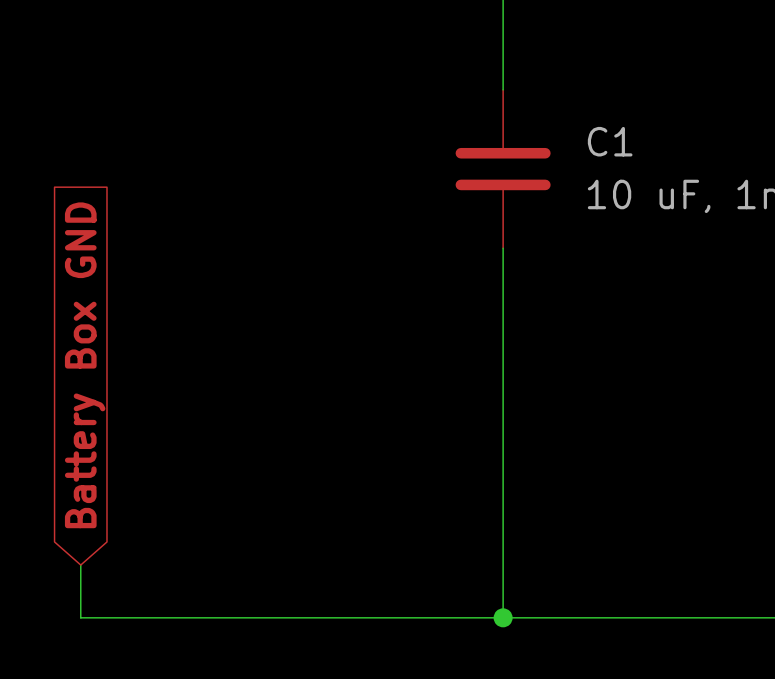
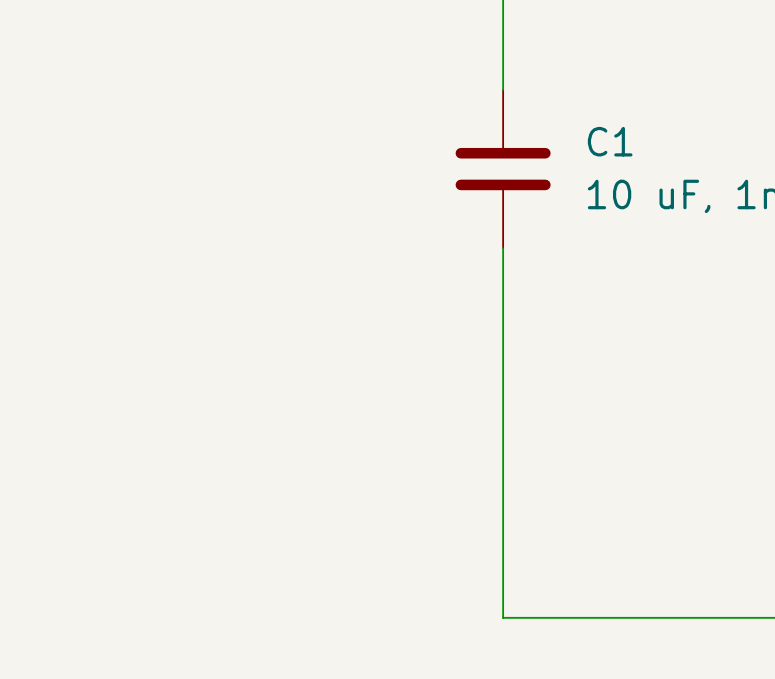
global label: Battery Box GND (85, 365) -> none
wire: (80, 565) (80, 617) (503, 617) -> none
junction: (503, 617) -> none

